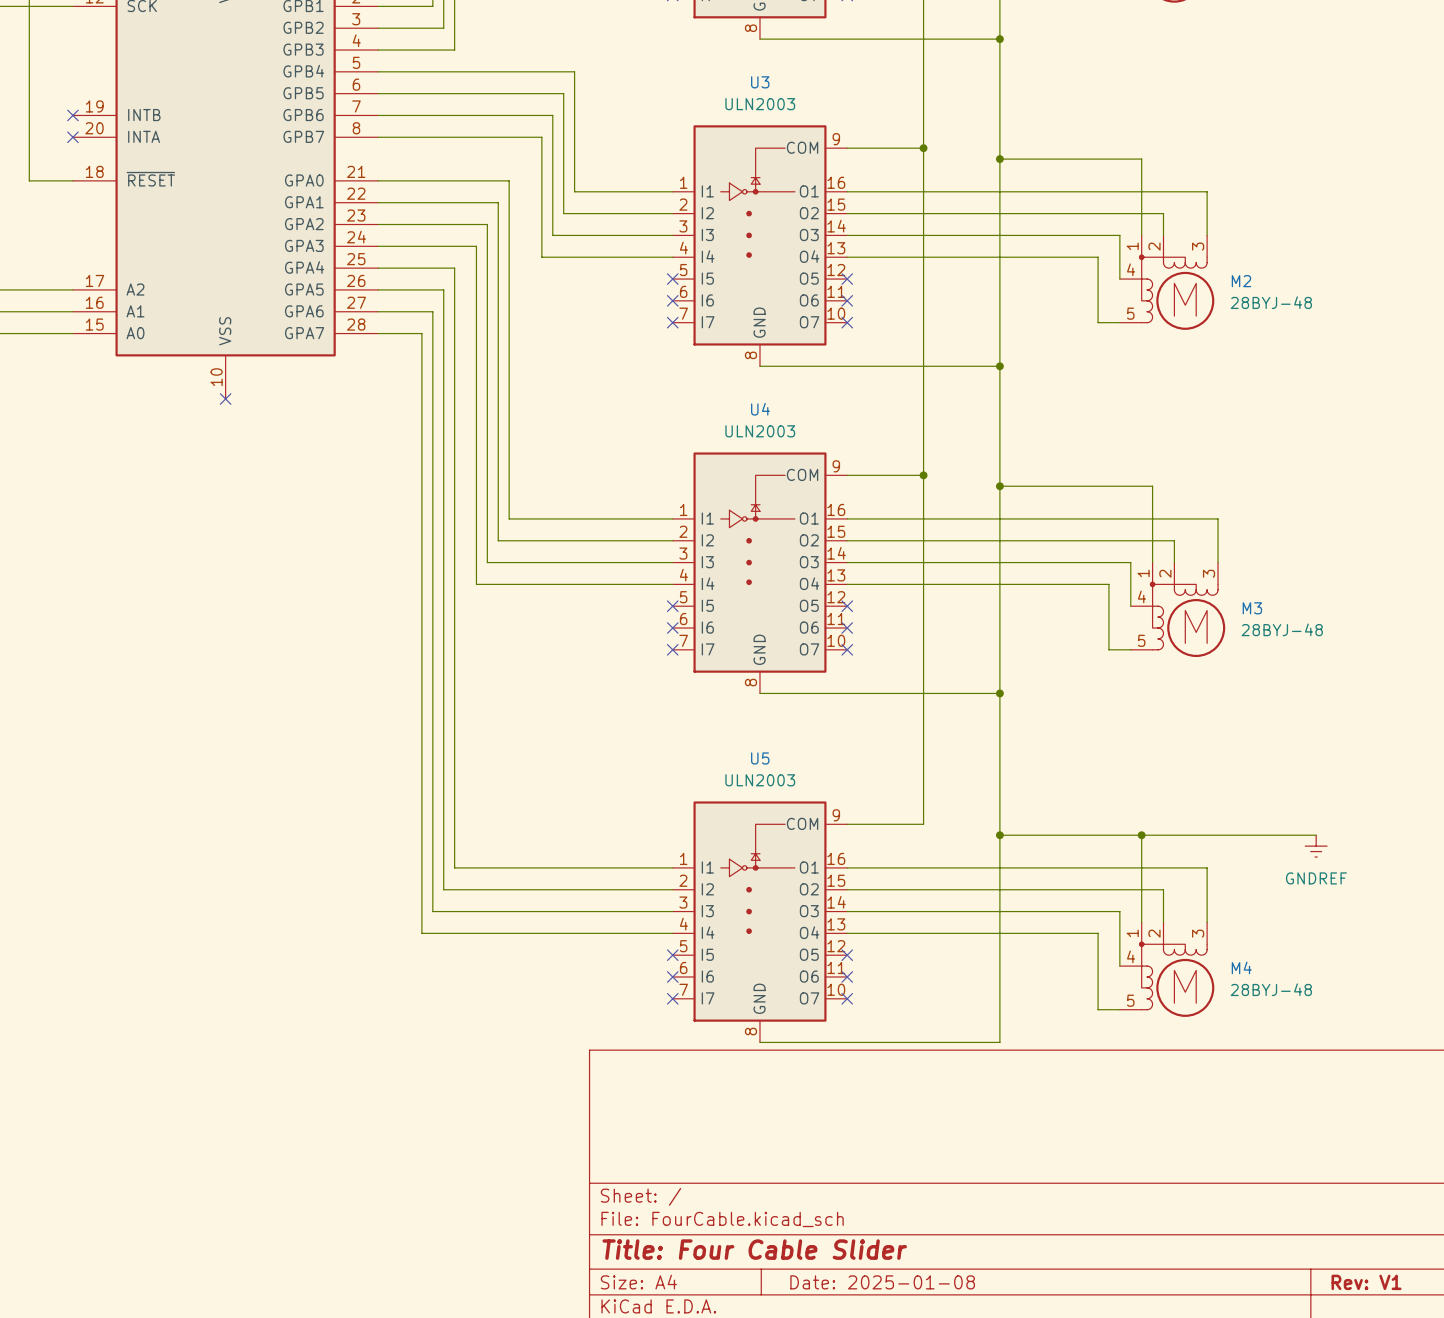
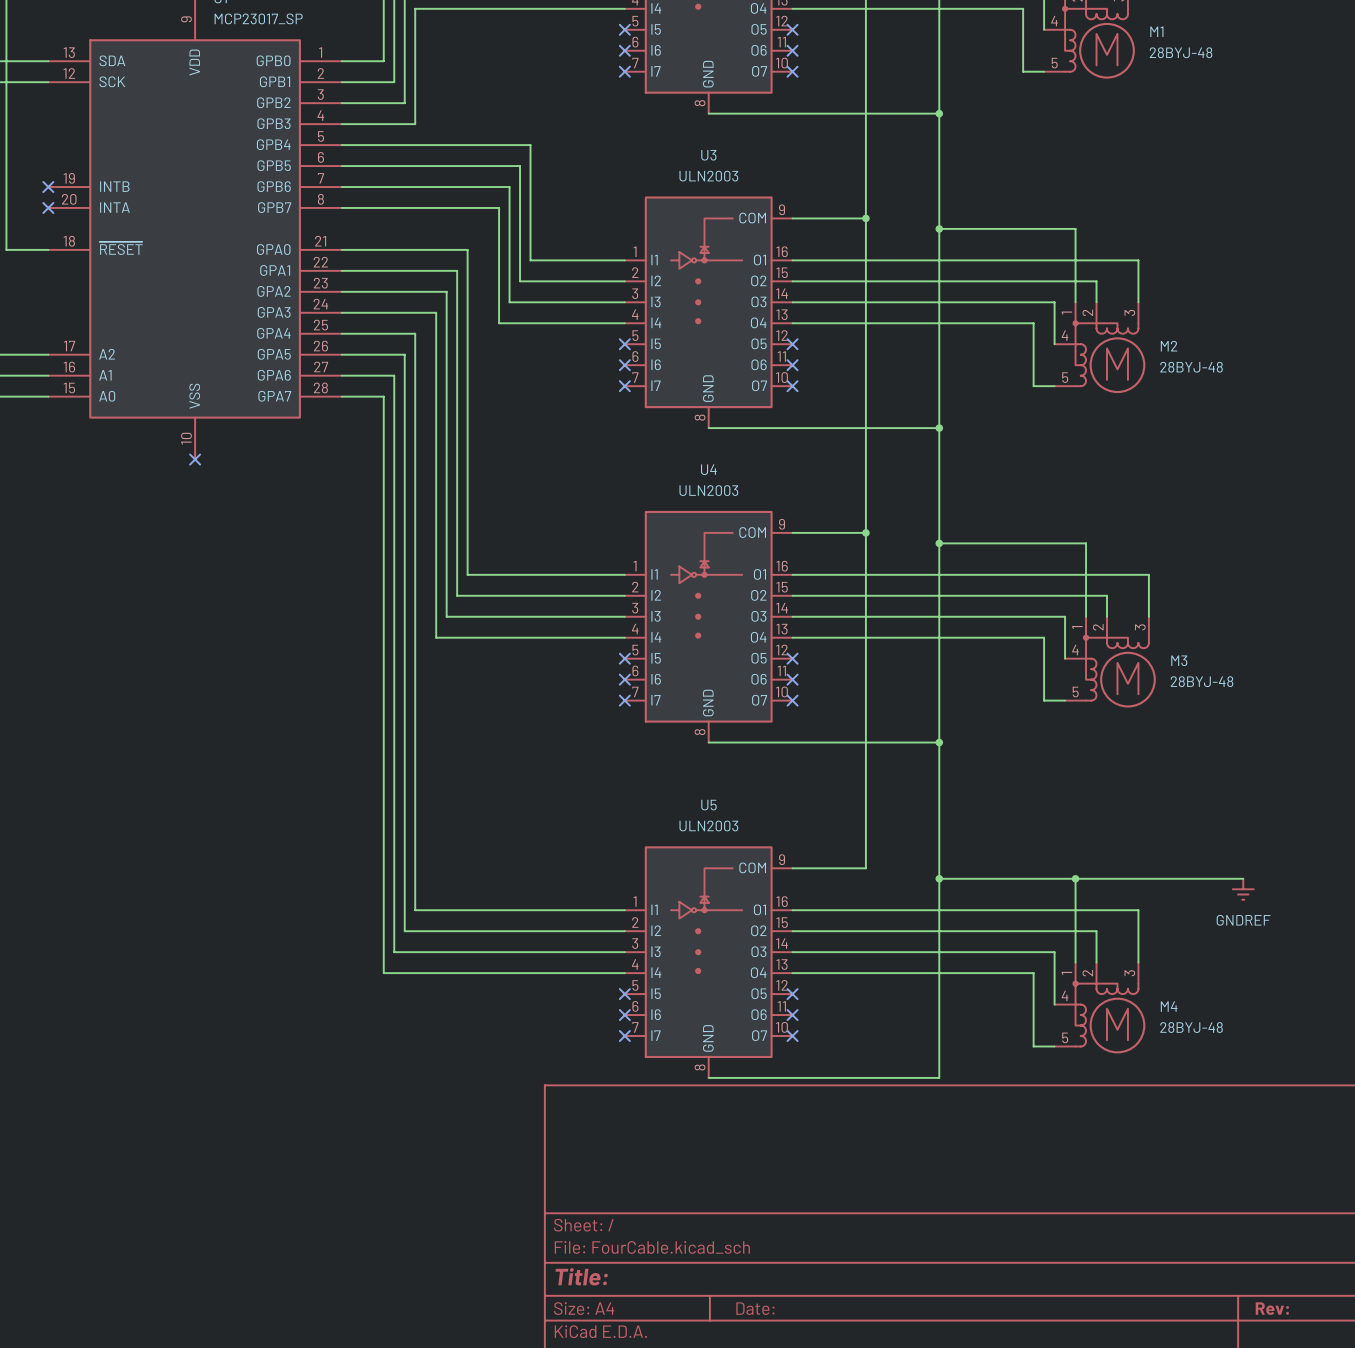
title block: Title: Four Cable Slider (754, 1249) -> Title: (581, 1276)
title block: Date: 2025-01-08 (882, 1282) -> Date: (755, 1308)
title block: Rev: V1 (1366, 1282) -> Rev: (1272, 1308)

